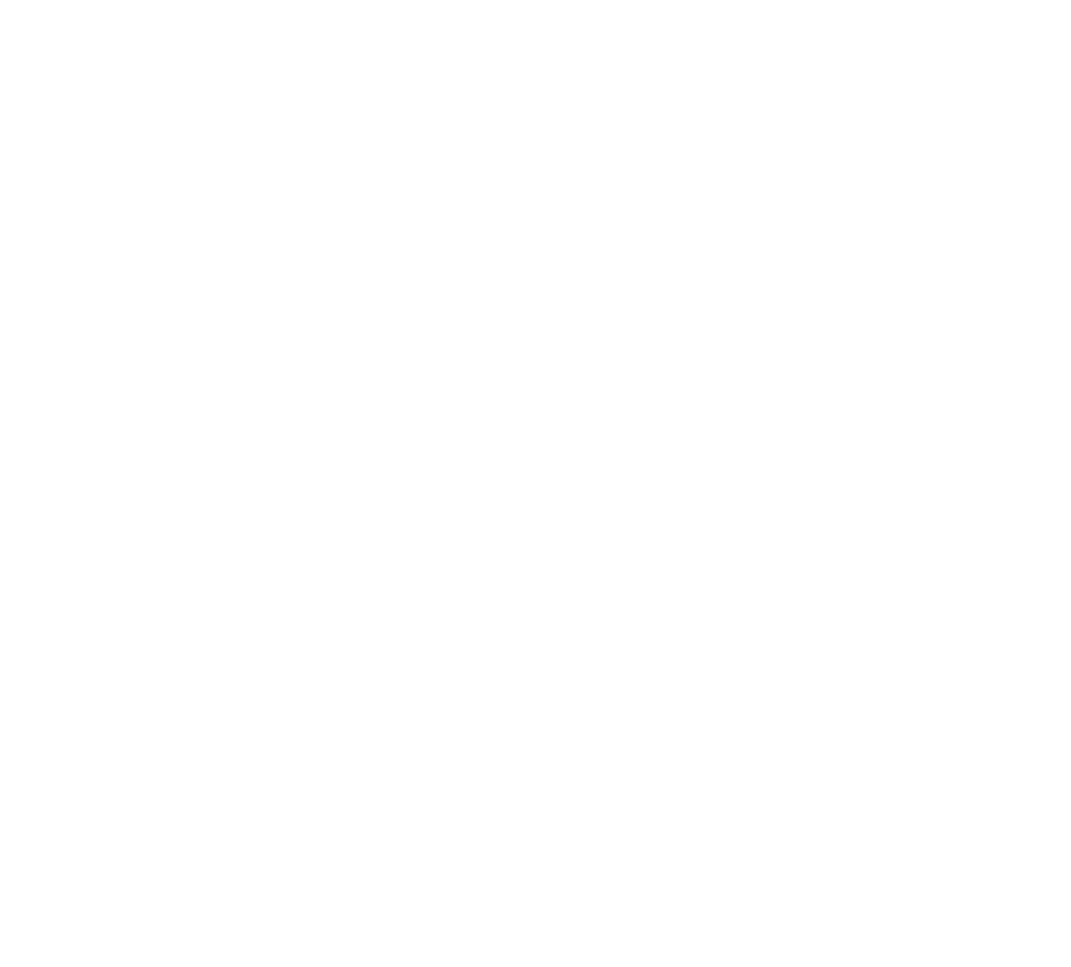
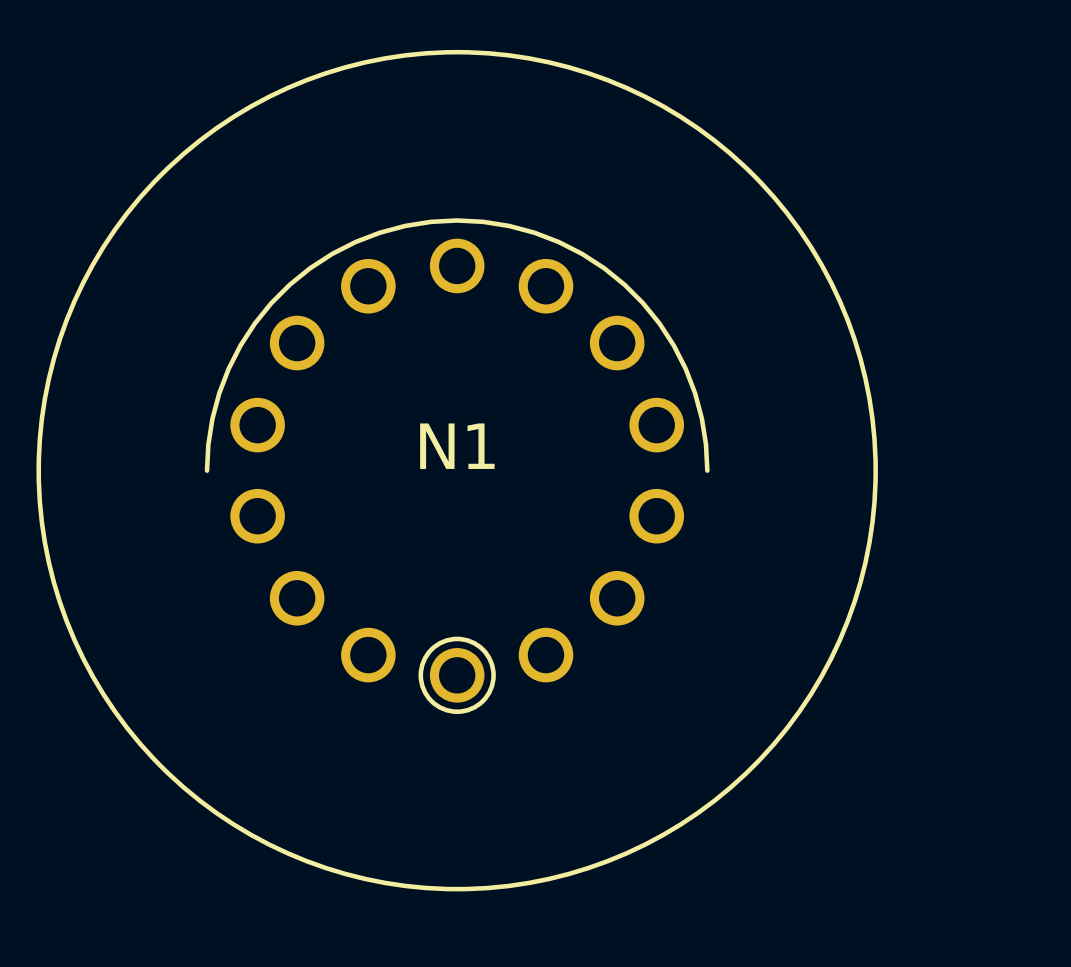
N1: none -> (457, 470)

